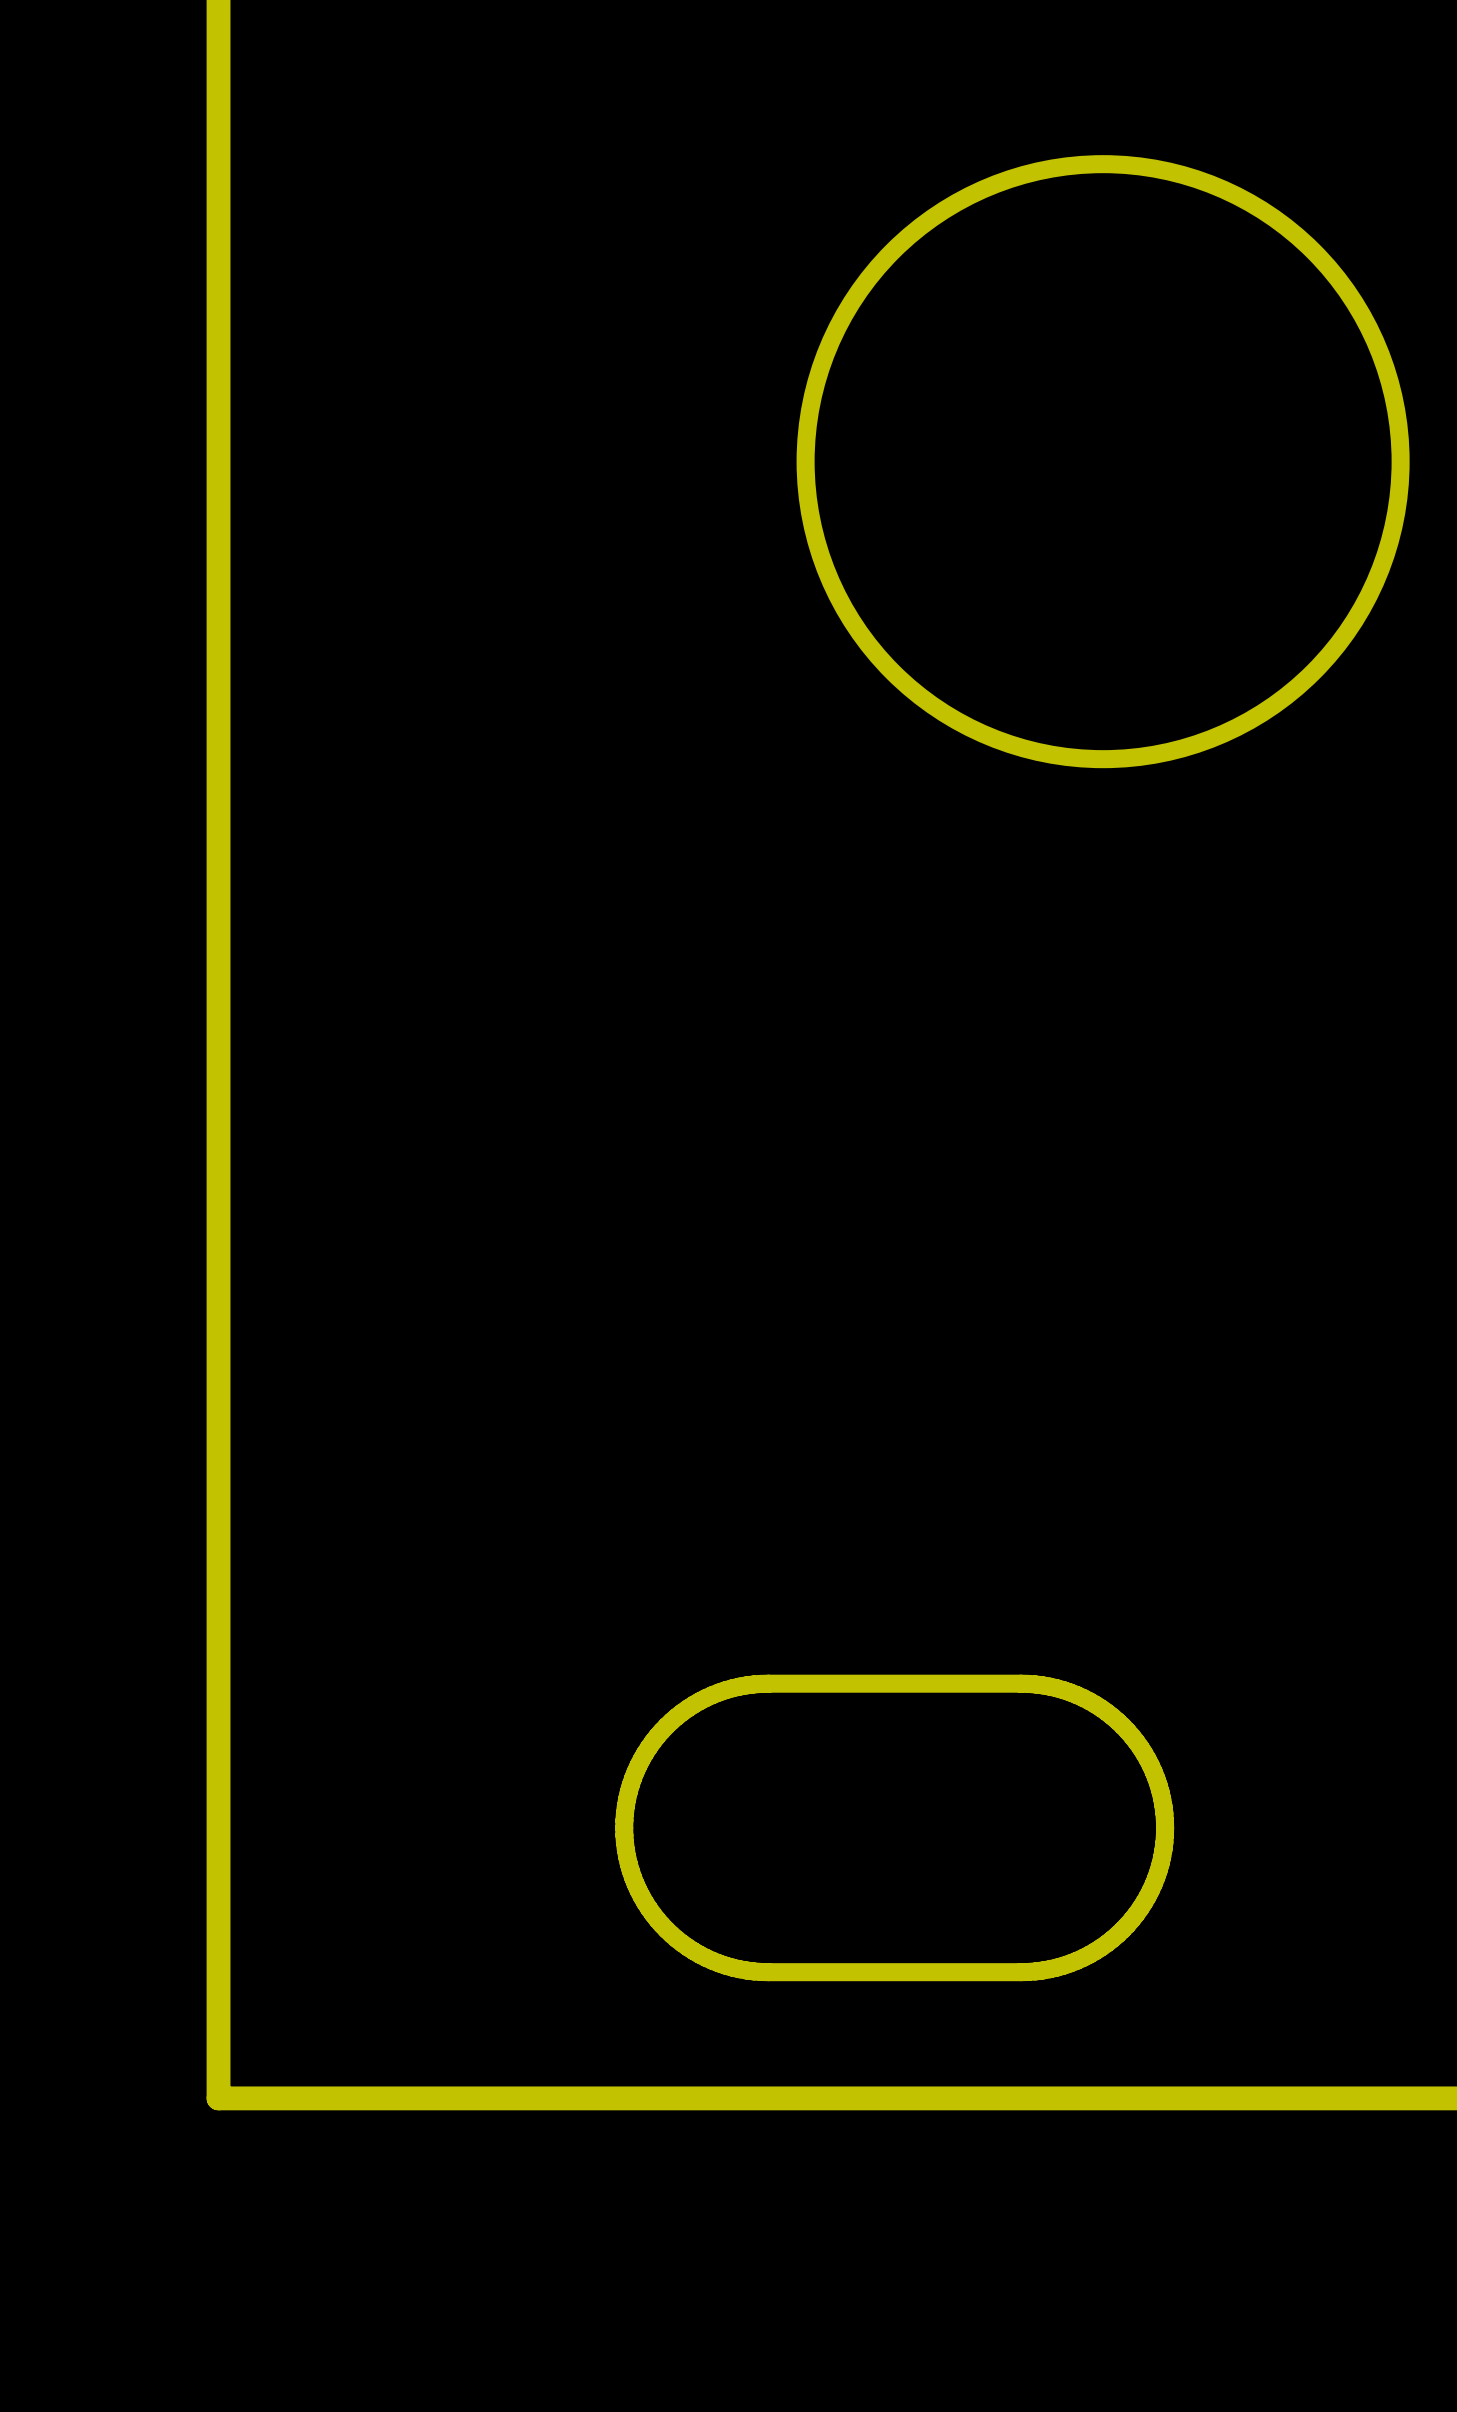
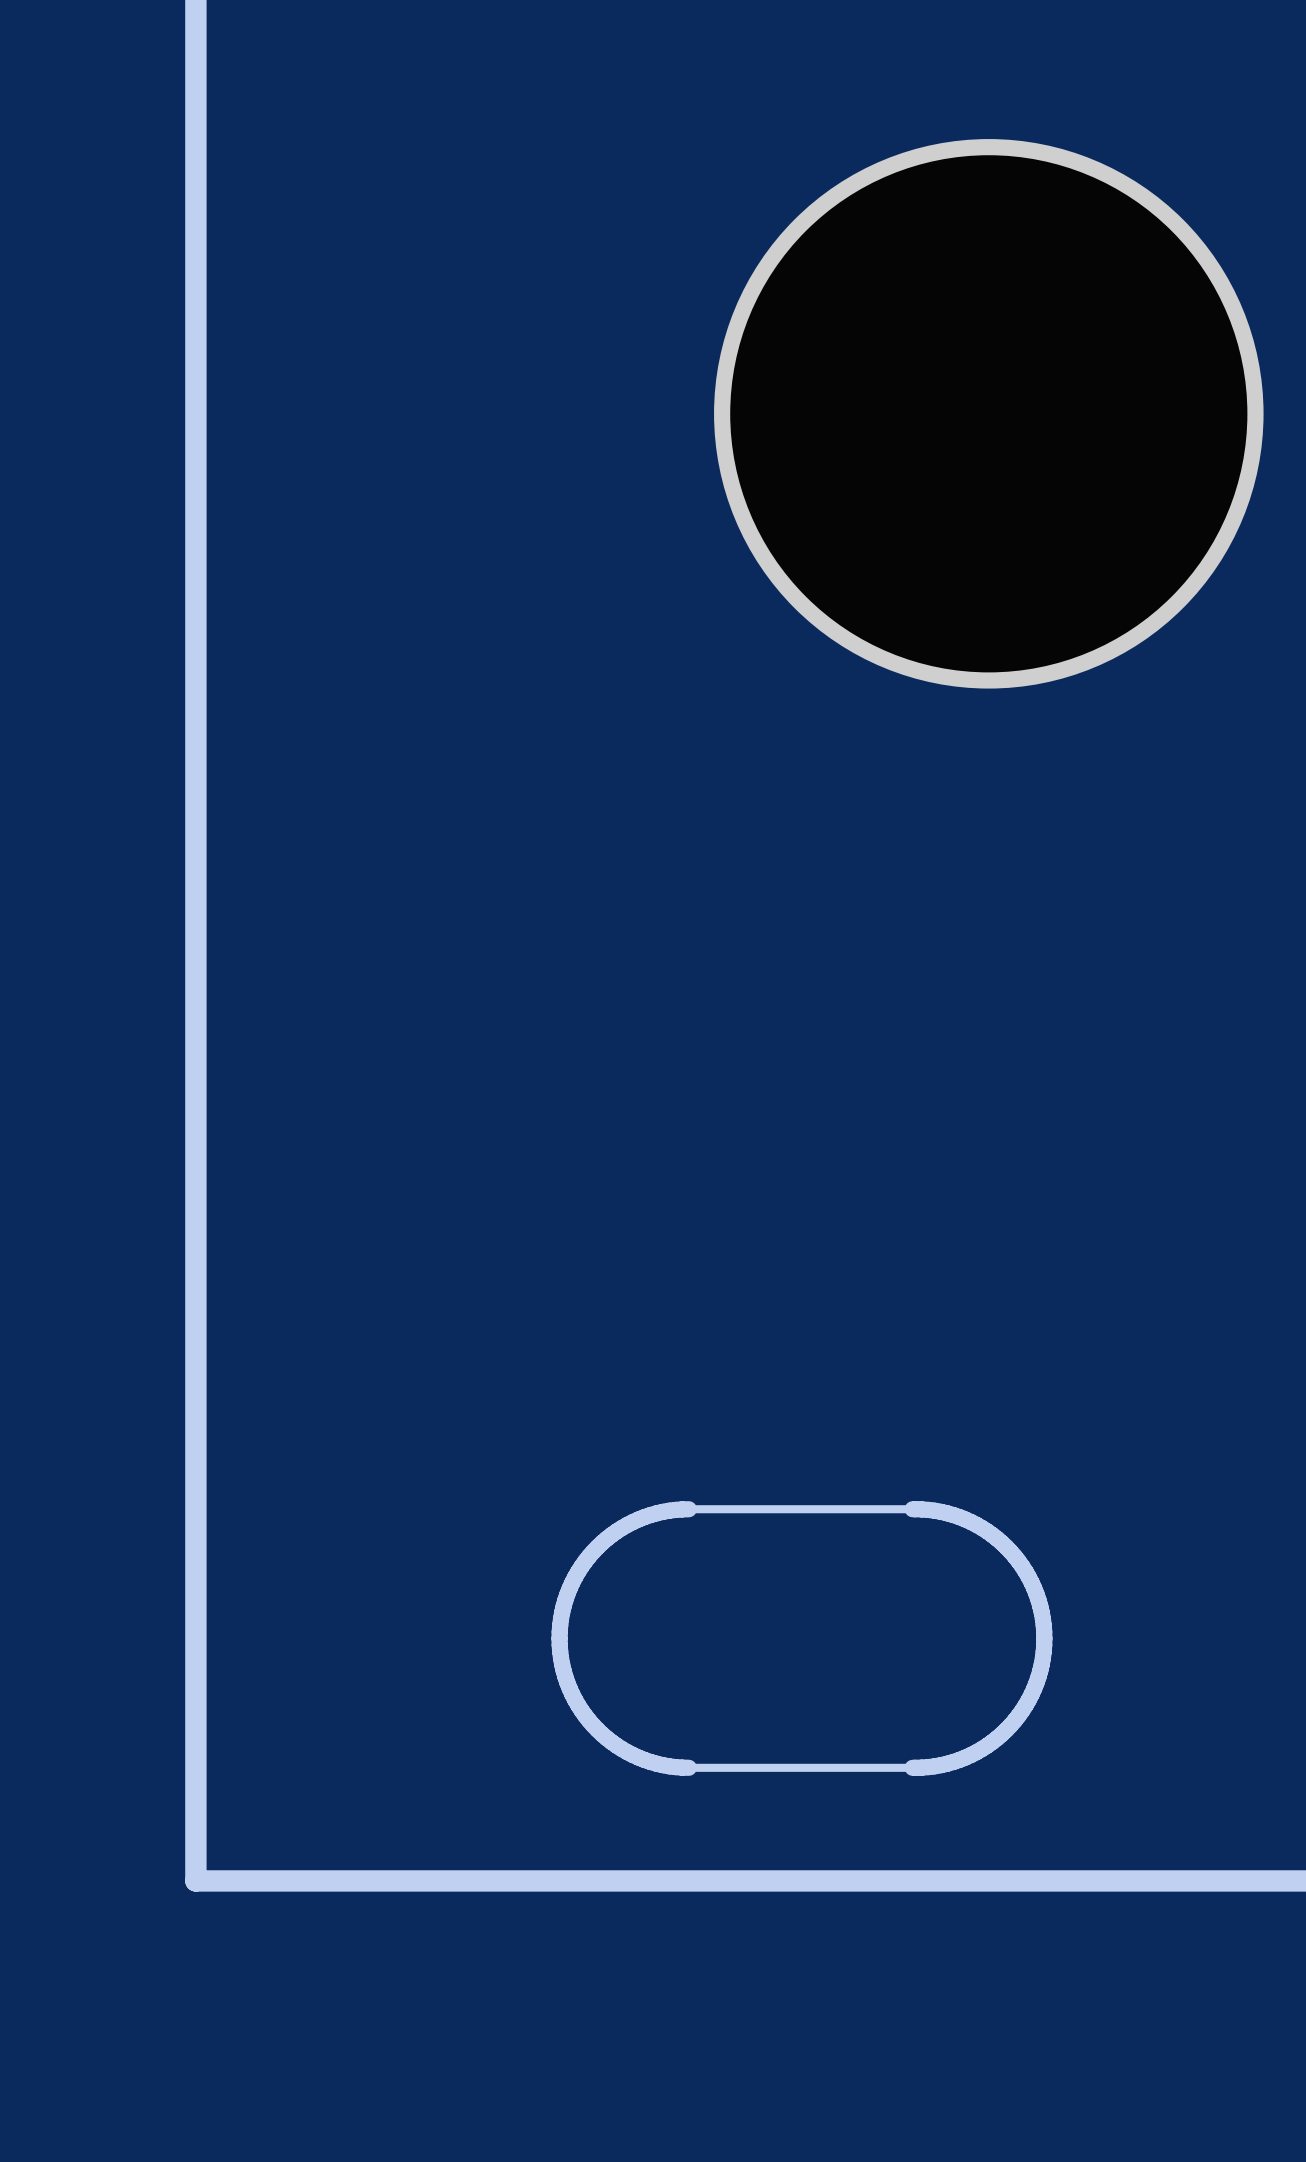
board edge width: thick (1020, 1683) (768, 1683) -> thin (915, 1509) (688, 1509)
board edge width: thick (1020, 1972) (768, 1972) -> thin (915, 1767) (688, 1767)

